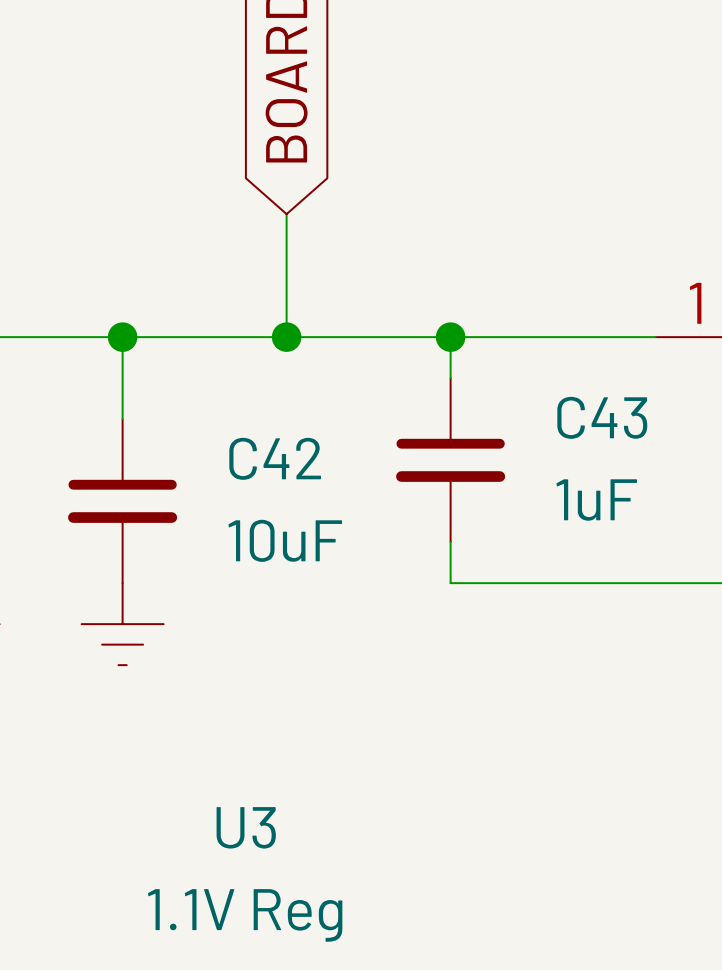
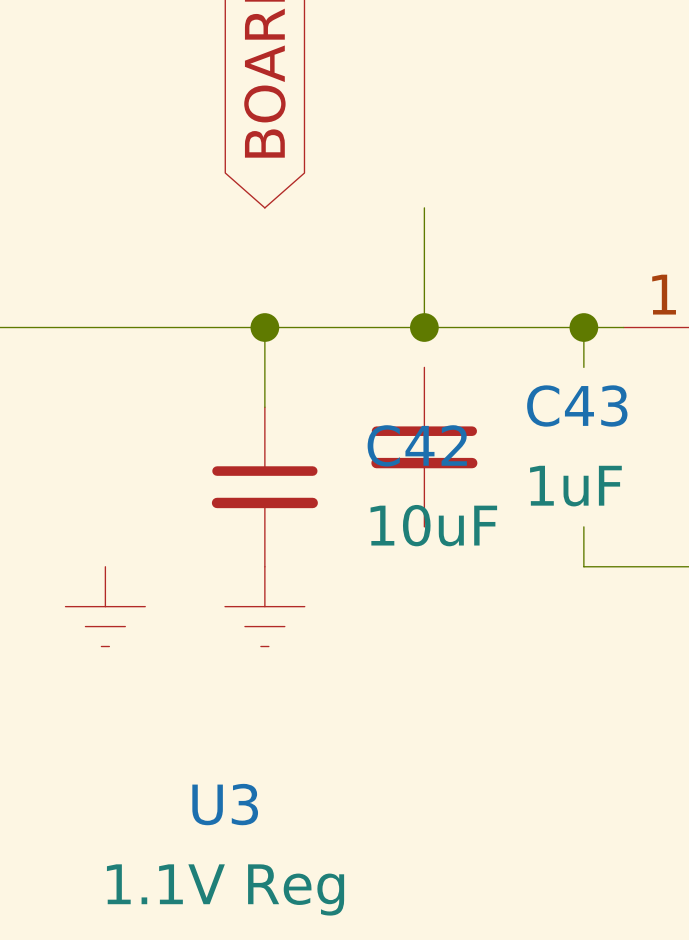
wire: (286, 214) (286, 337) -> (264, 407) (264, 327)
wire: (122, 337) (122, 419) -> none
junction: (122, 337) -> none
wire: (450, 337) (450, 378) -> (424, 327) (424, 207)
wire: none -> (583, 327) (583, 367)
junction: none -> (583, 327)
C42 position: (122, 501) -> (264, 487)
wire: (450, 542) (450, 583) (614, 583) -> (583, 526) (583, 566)
power symbol: none -> (264, 606)

